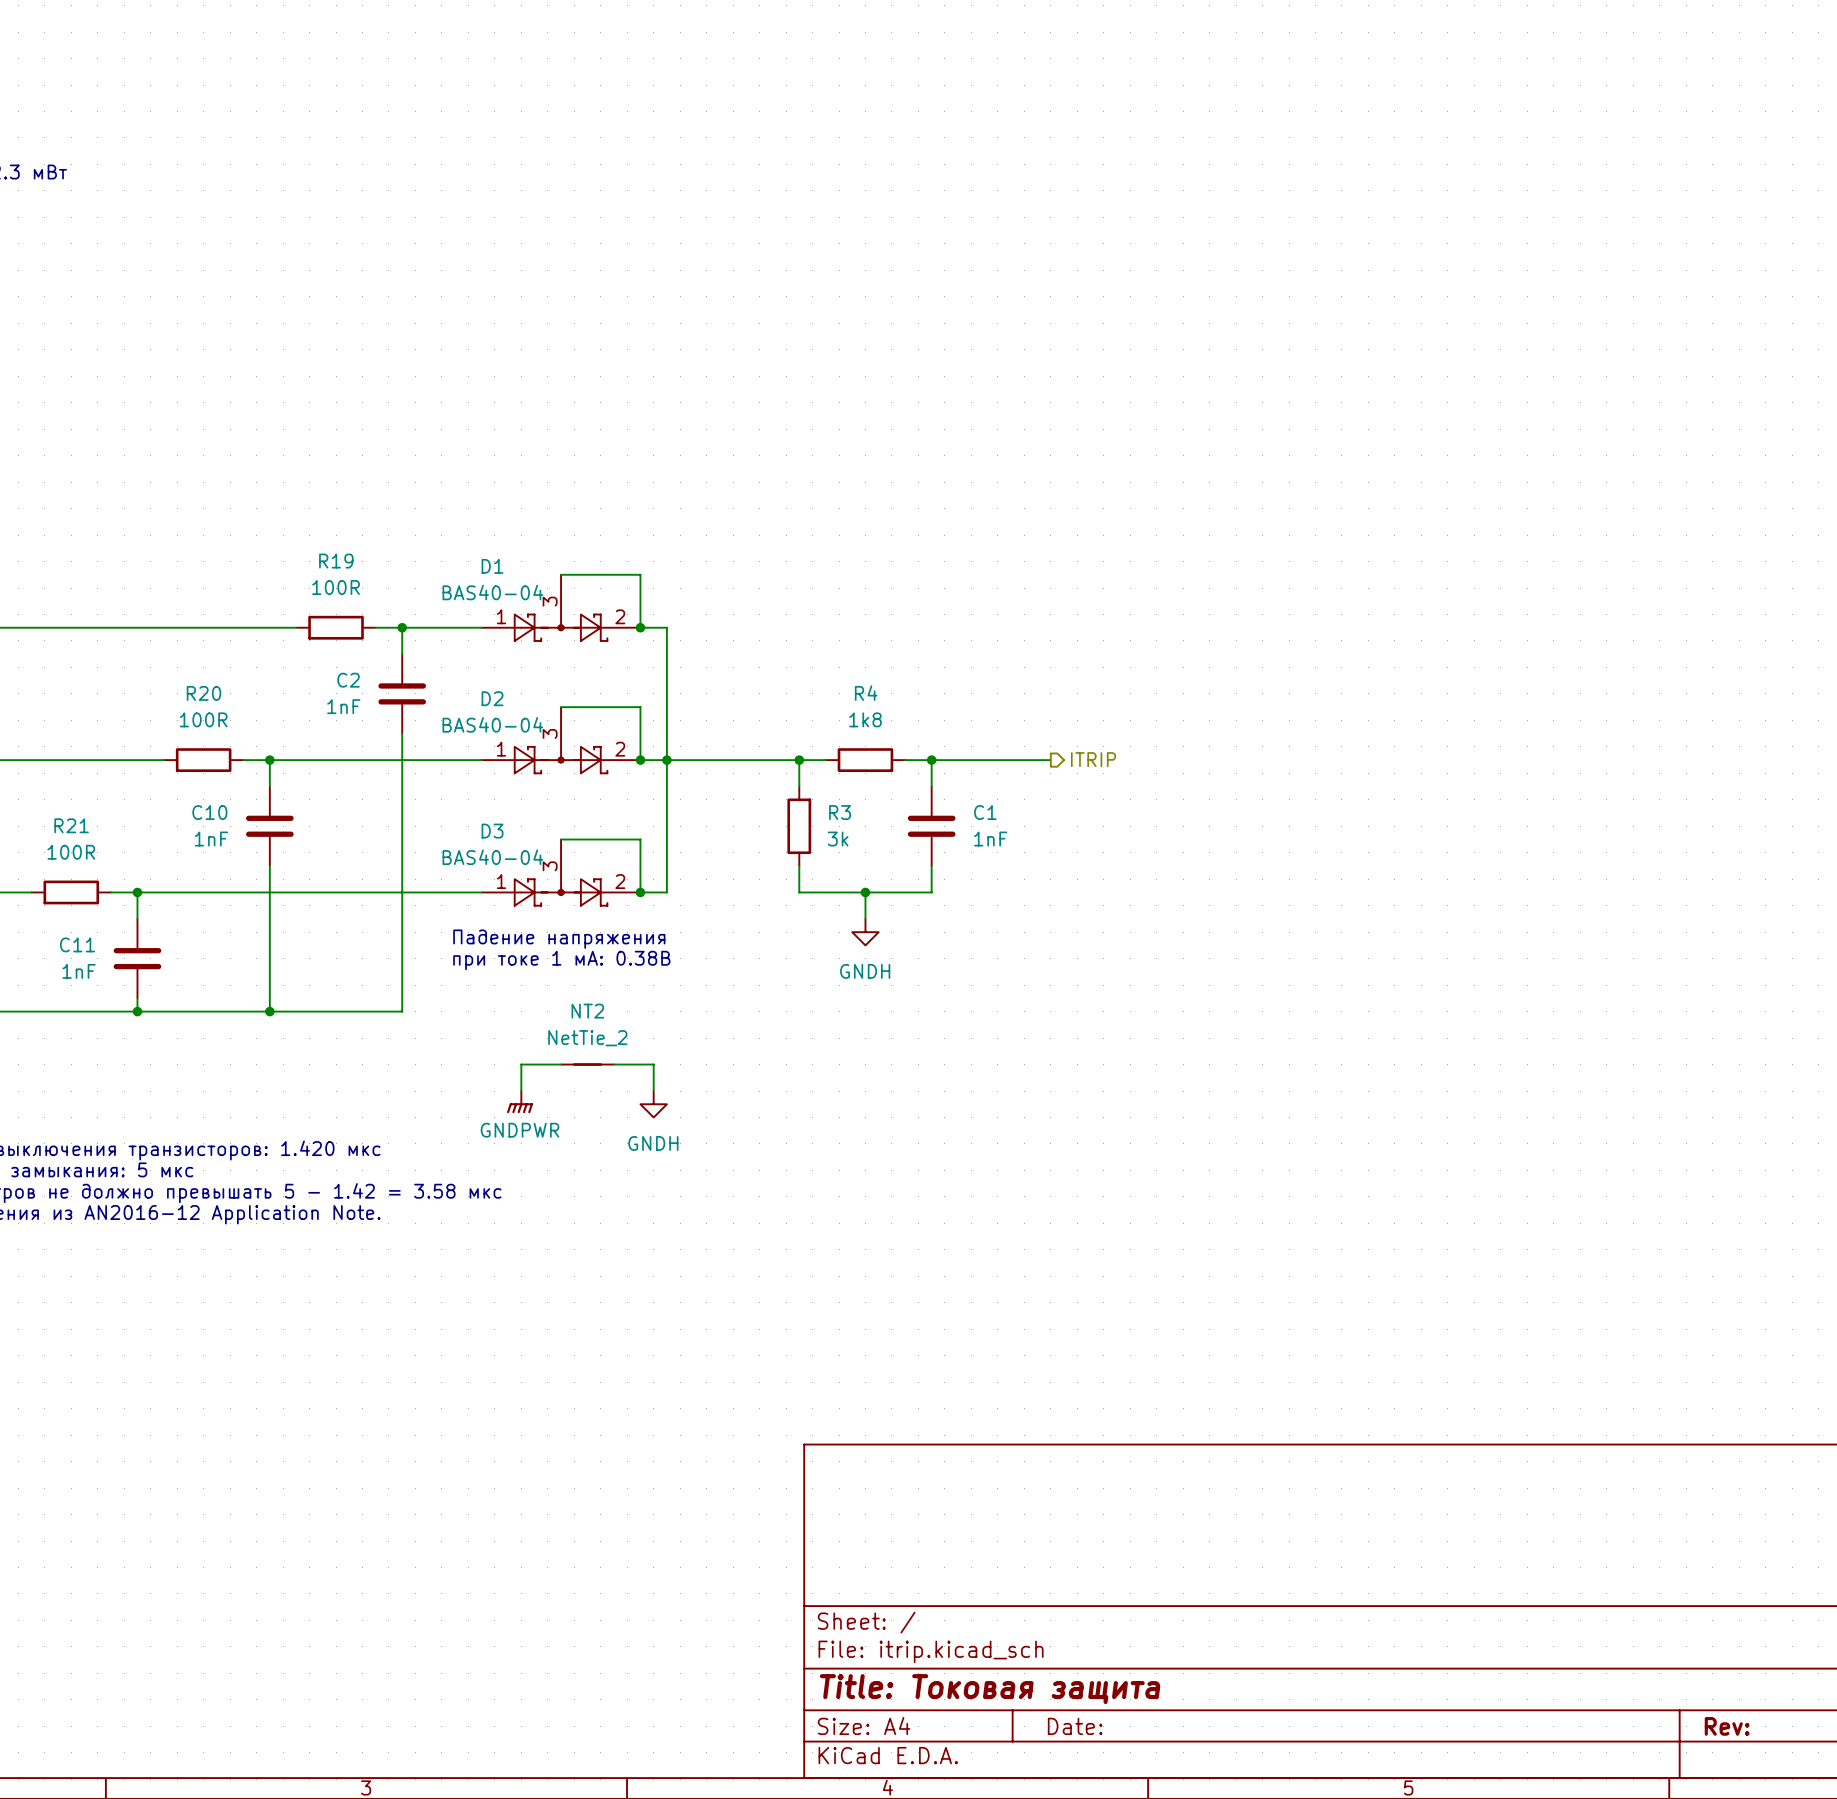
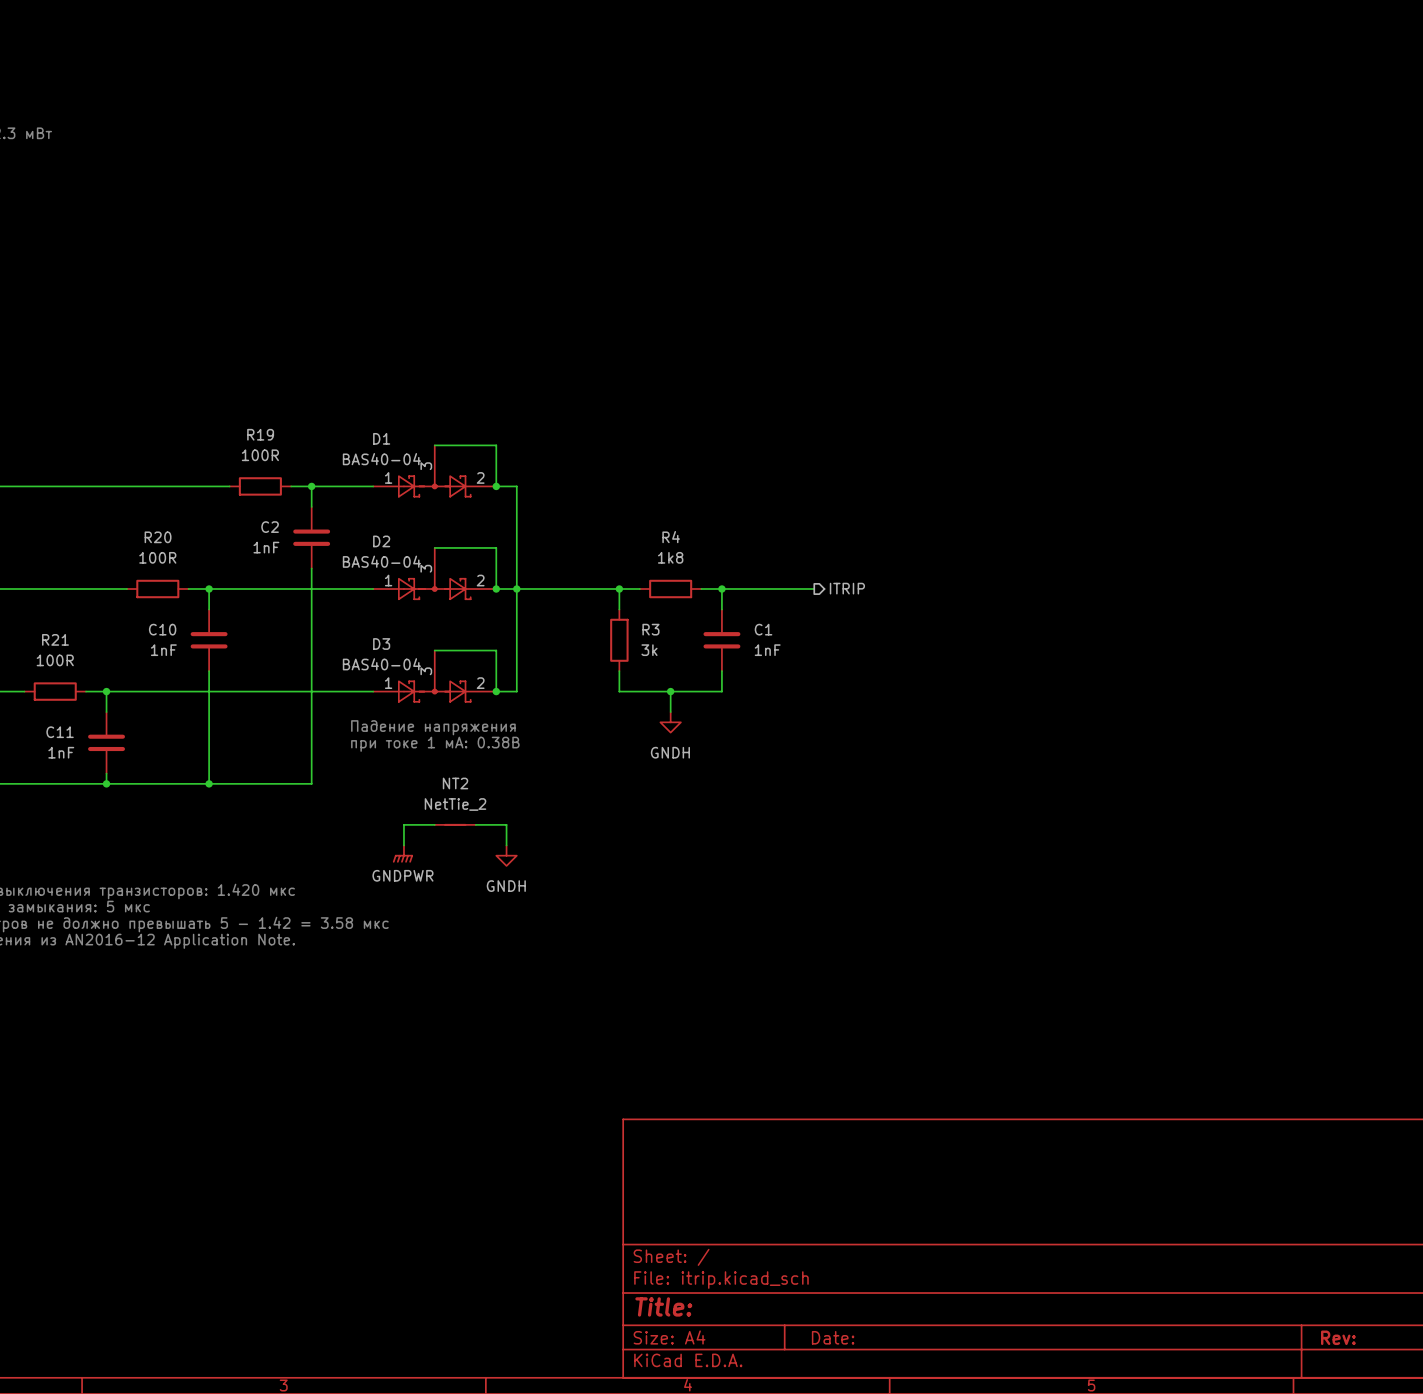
title block: Title: Токовая защита (990, 1689) -> Title: (663, 1306)

